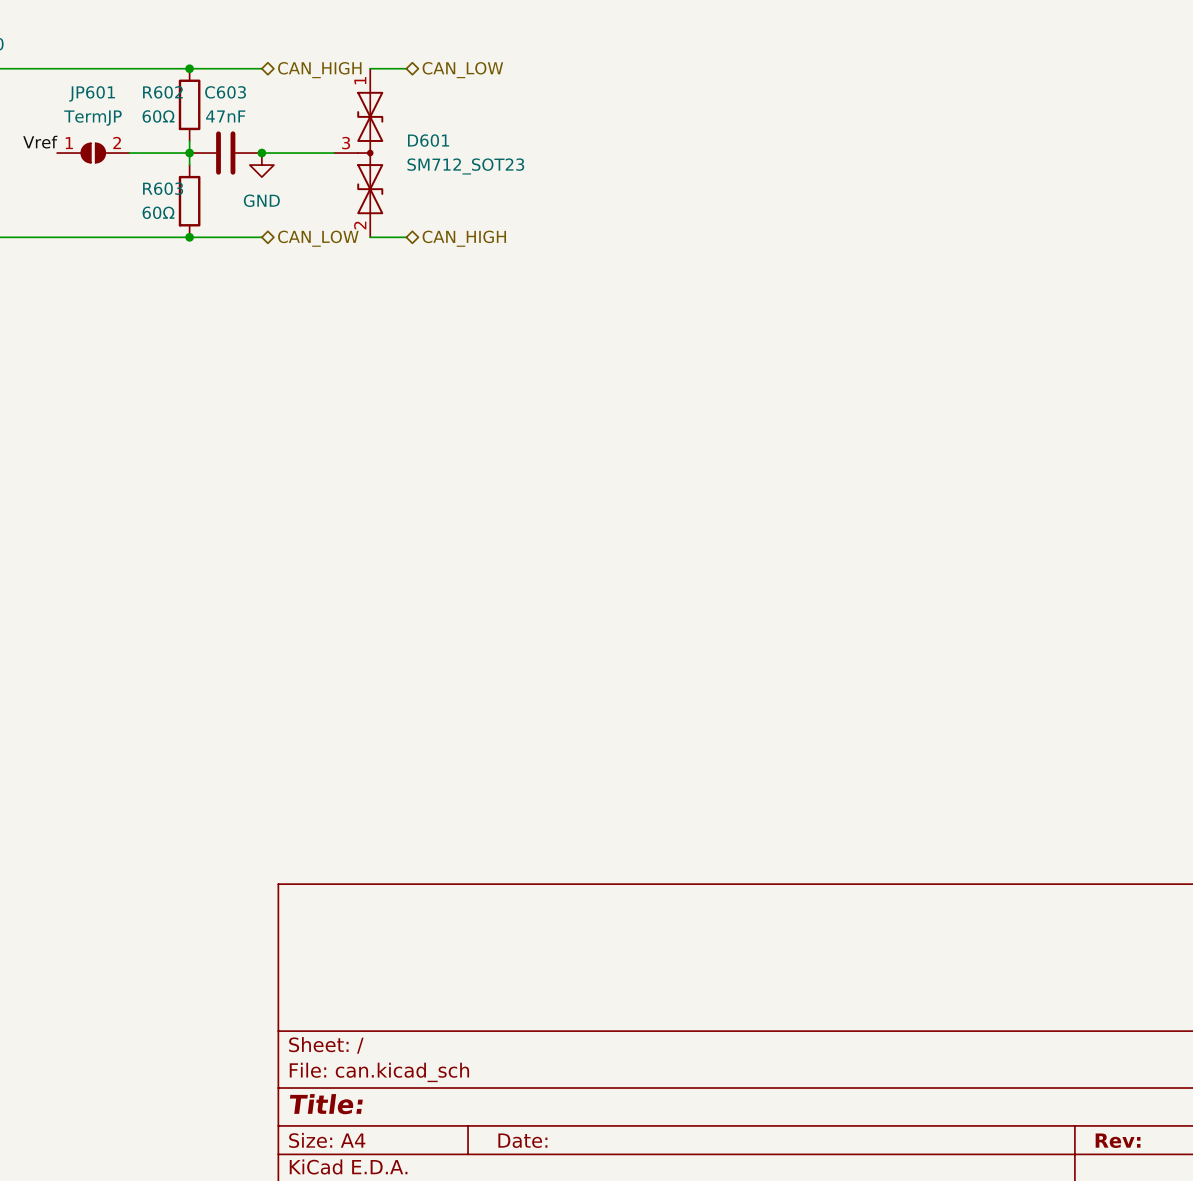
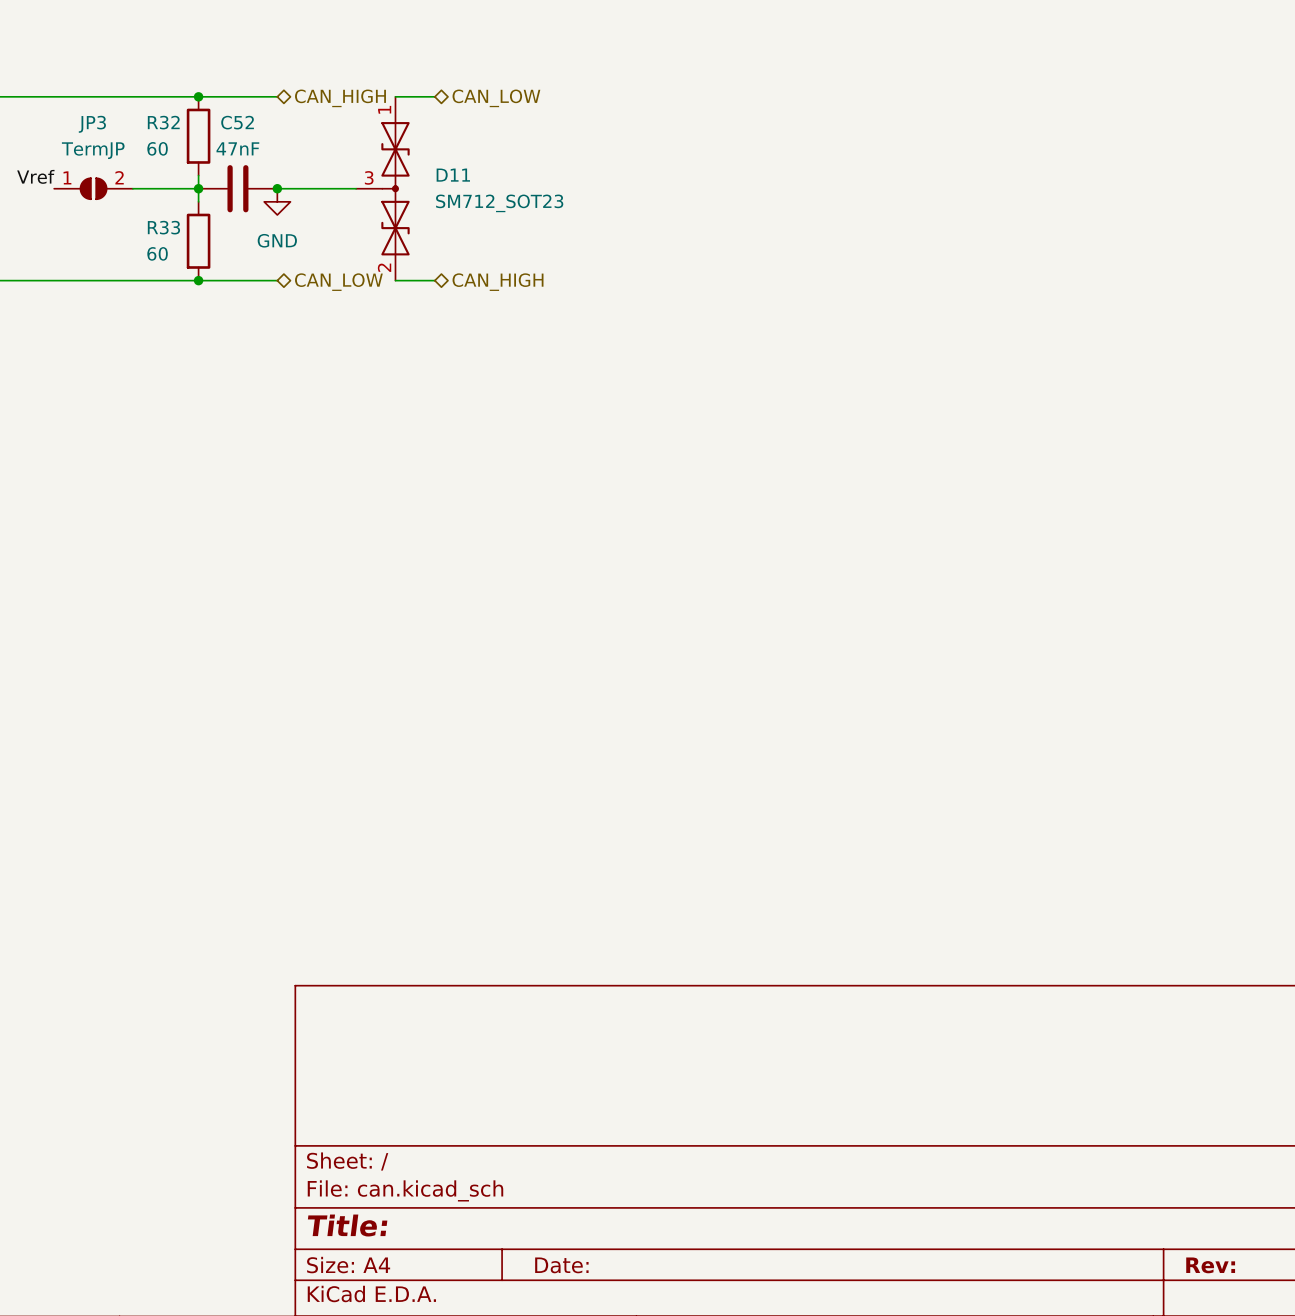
R602 name: R602 (162, 92) -> R32 (163, 122)
C603 name: C603 (225, 92) -> C52 (237, 122)
JP601 name: JP601 (92, 93) -> JP3 (92, 124)
R602 value: 60Ω (158, 116) -> 60 (157, 148)
D601 name: D601 (428, 140) -> D11 (453, 175)
R603 name: R603 (163, 188) -> R33 (163, 227)
R603 value: 60Ω (158, 212) -> 60 (157, 253)

